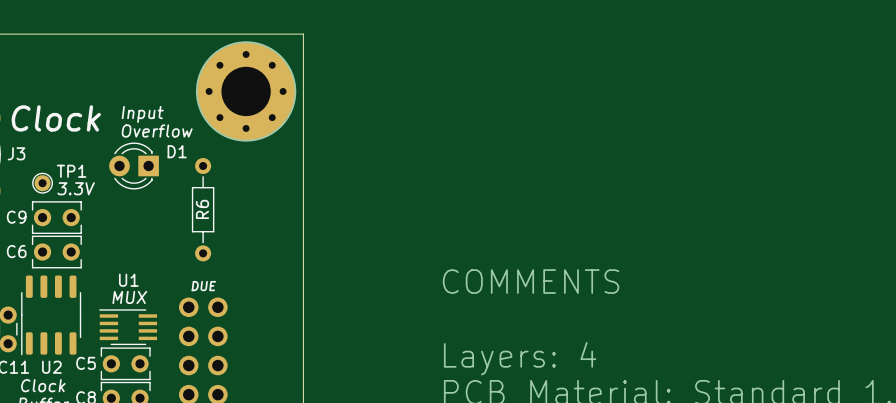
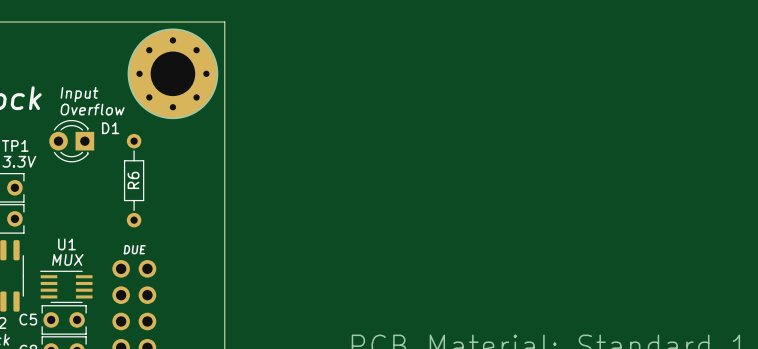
text: COMMENTS (531, 281) -> none
text: Layers: 4 (520, 358) -> none

